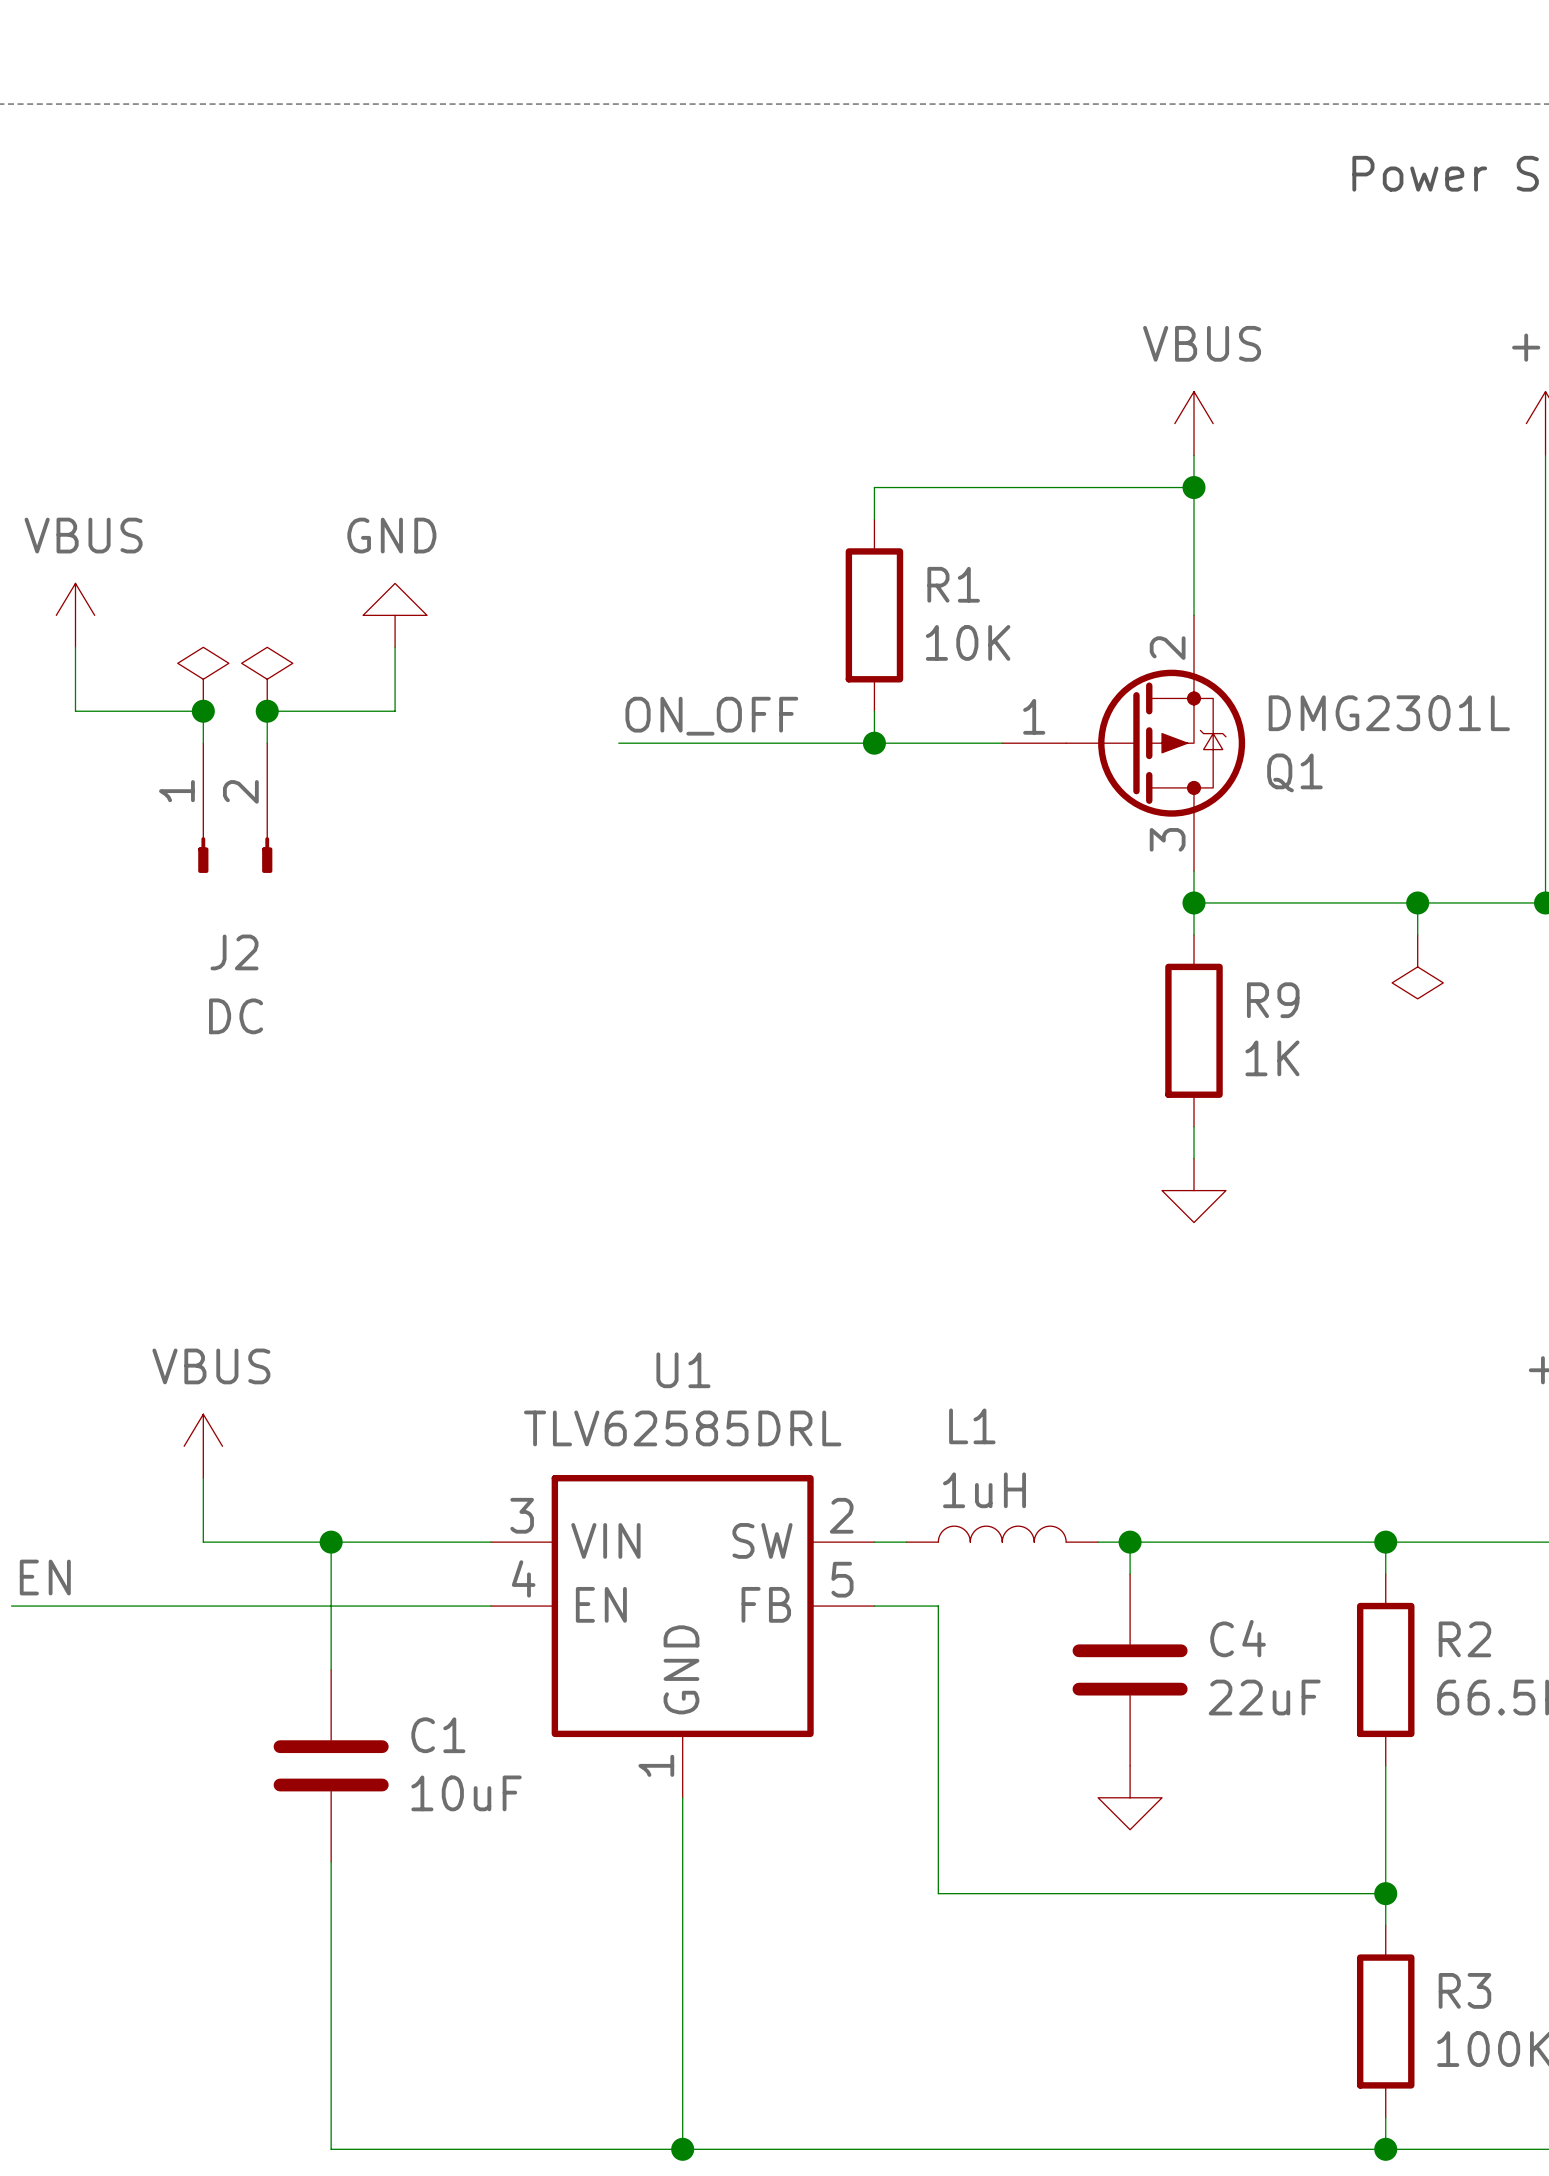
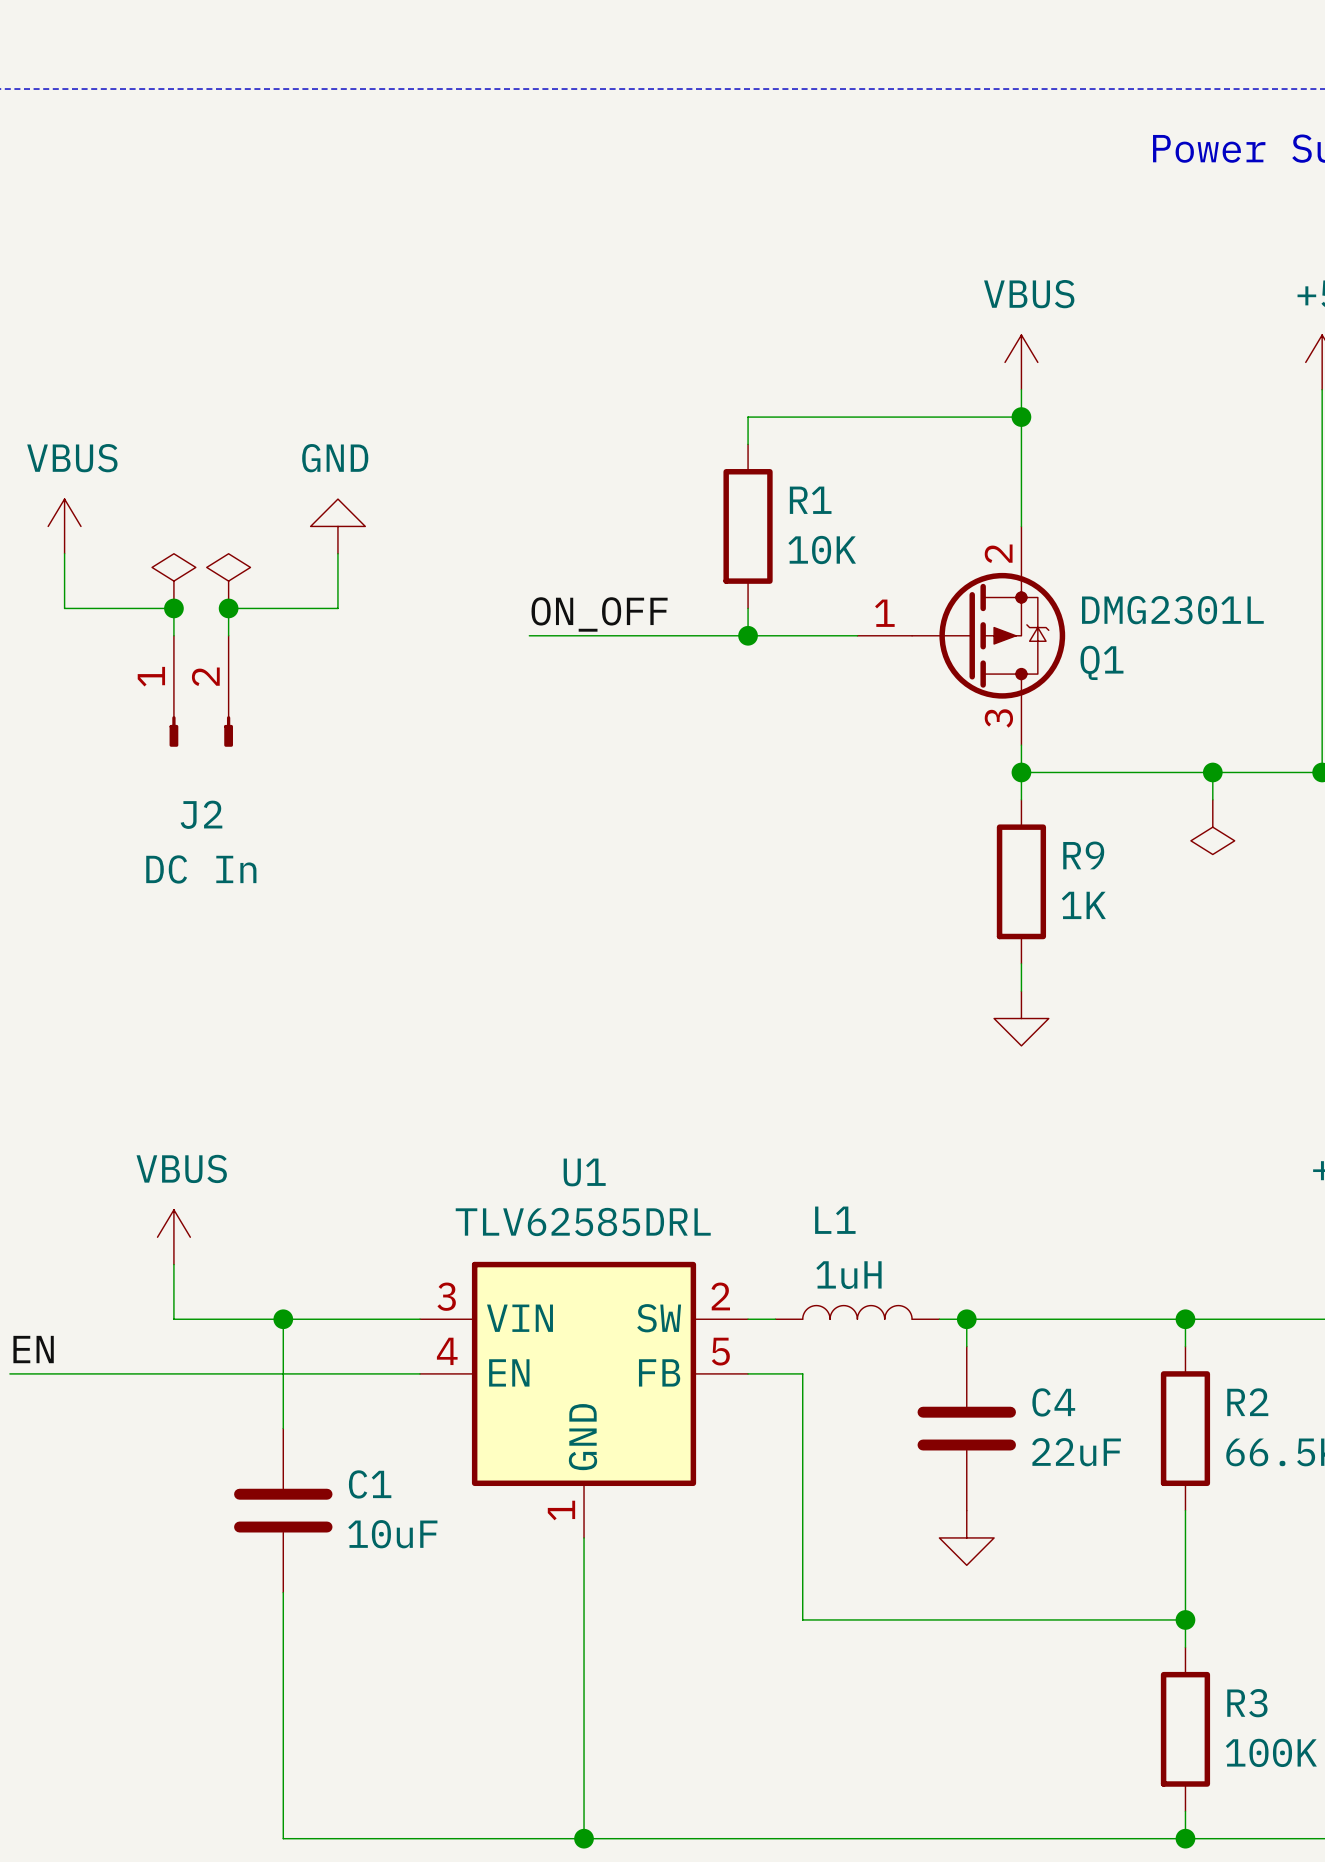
J2 value: DC (236, 1016) -> DC In (201, 869)

